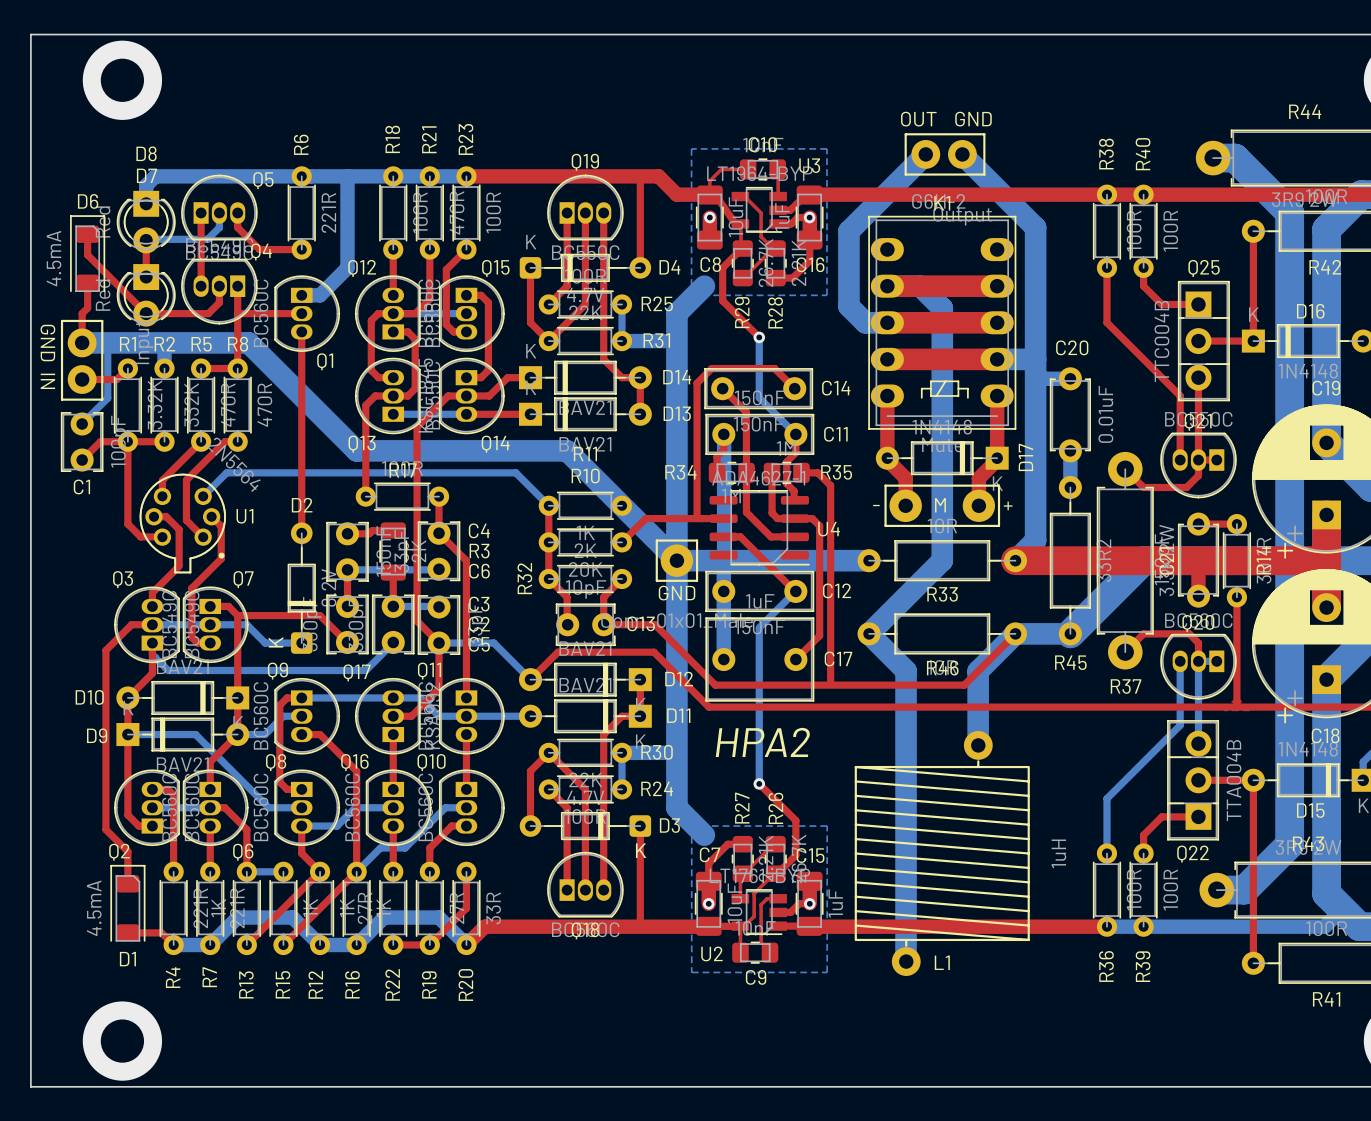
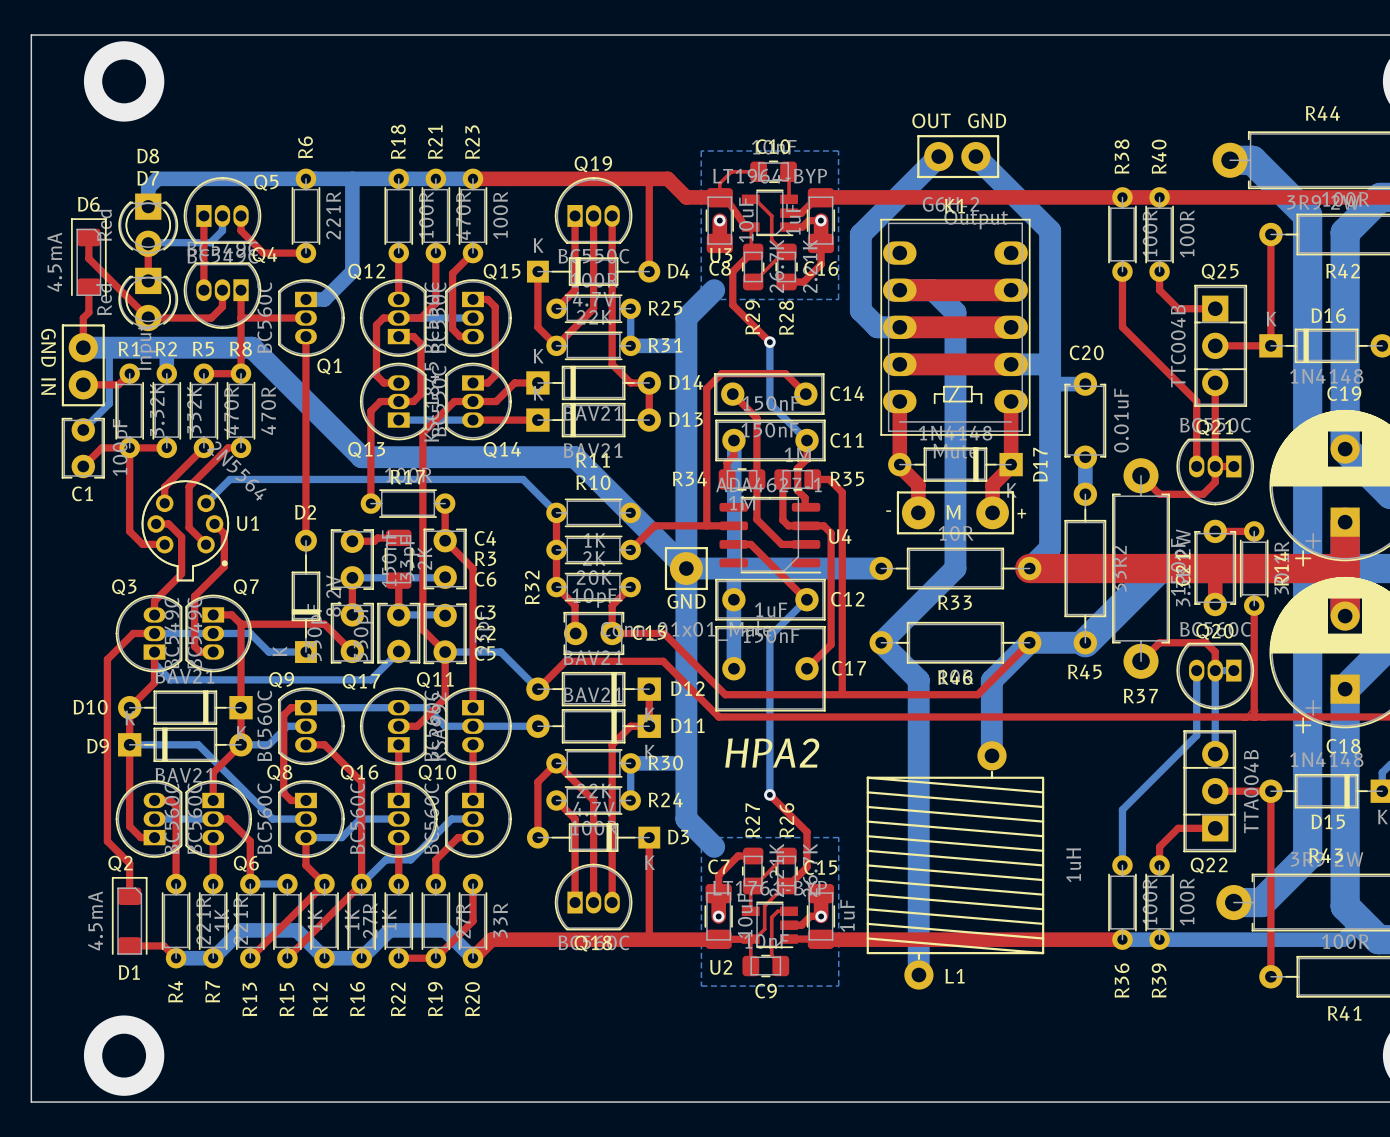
U3 name position: U3 (809, 165) -> U3 (721, 255)
D4 footprint: [519, 253, 652, 283] -> [526, 257, 661, 286]
D2 footprint: [287, 522, 316, 654] -> [291, 529, 321, 663]
D3 footprint: [519, 811, 652, 841] -> [526, 823, 661, 852]

